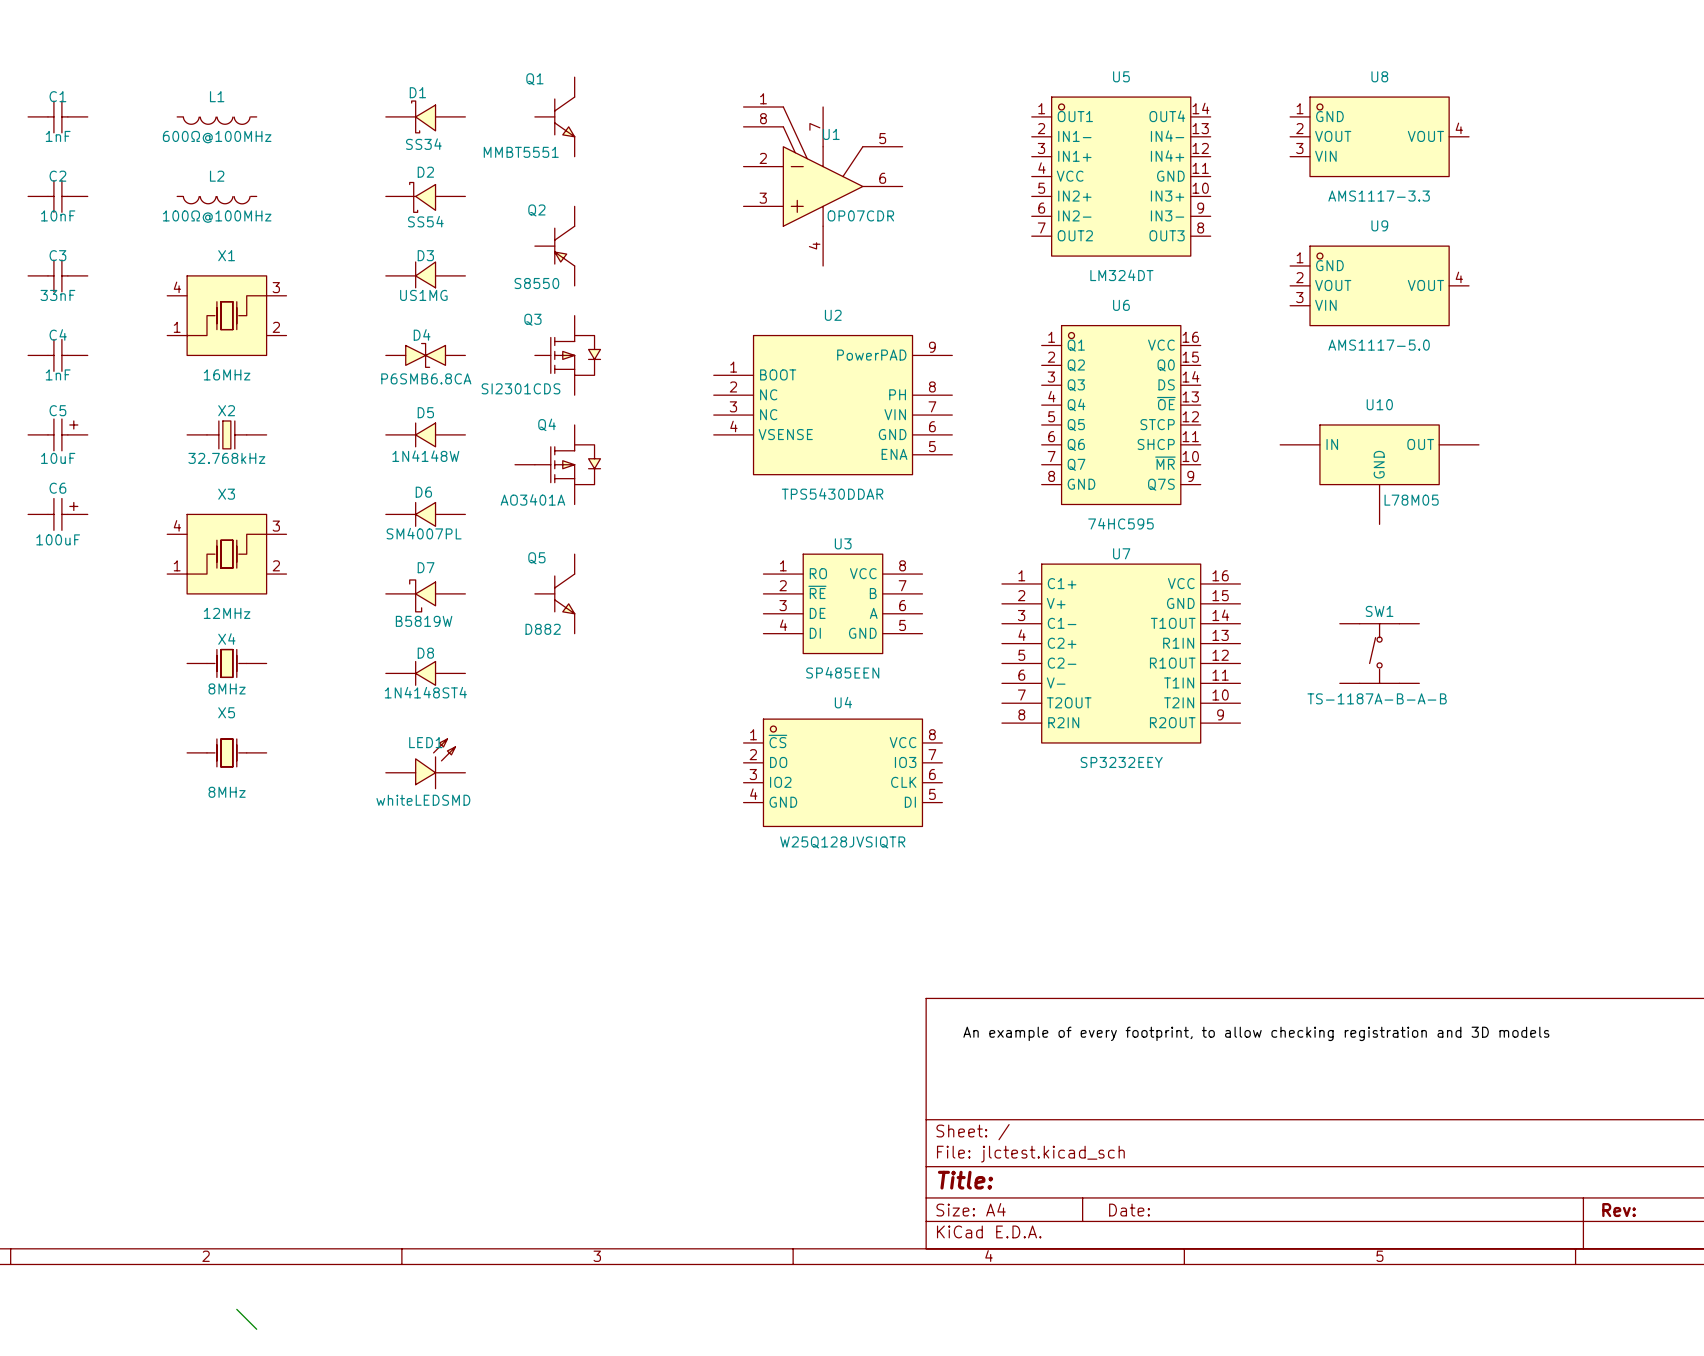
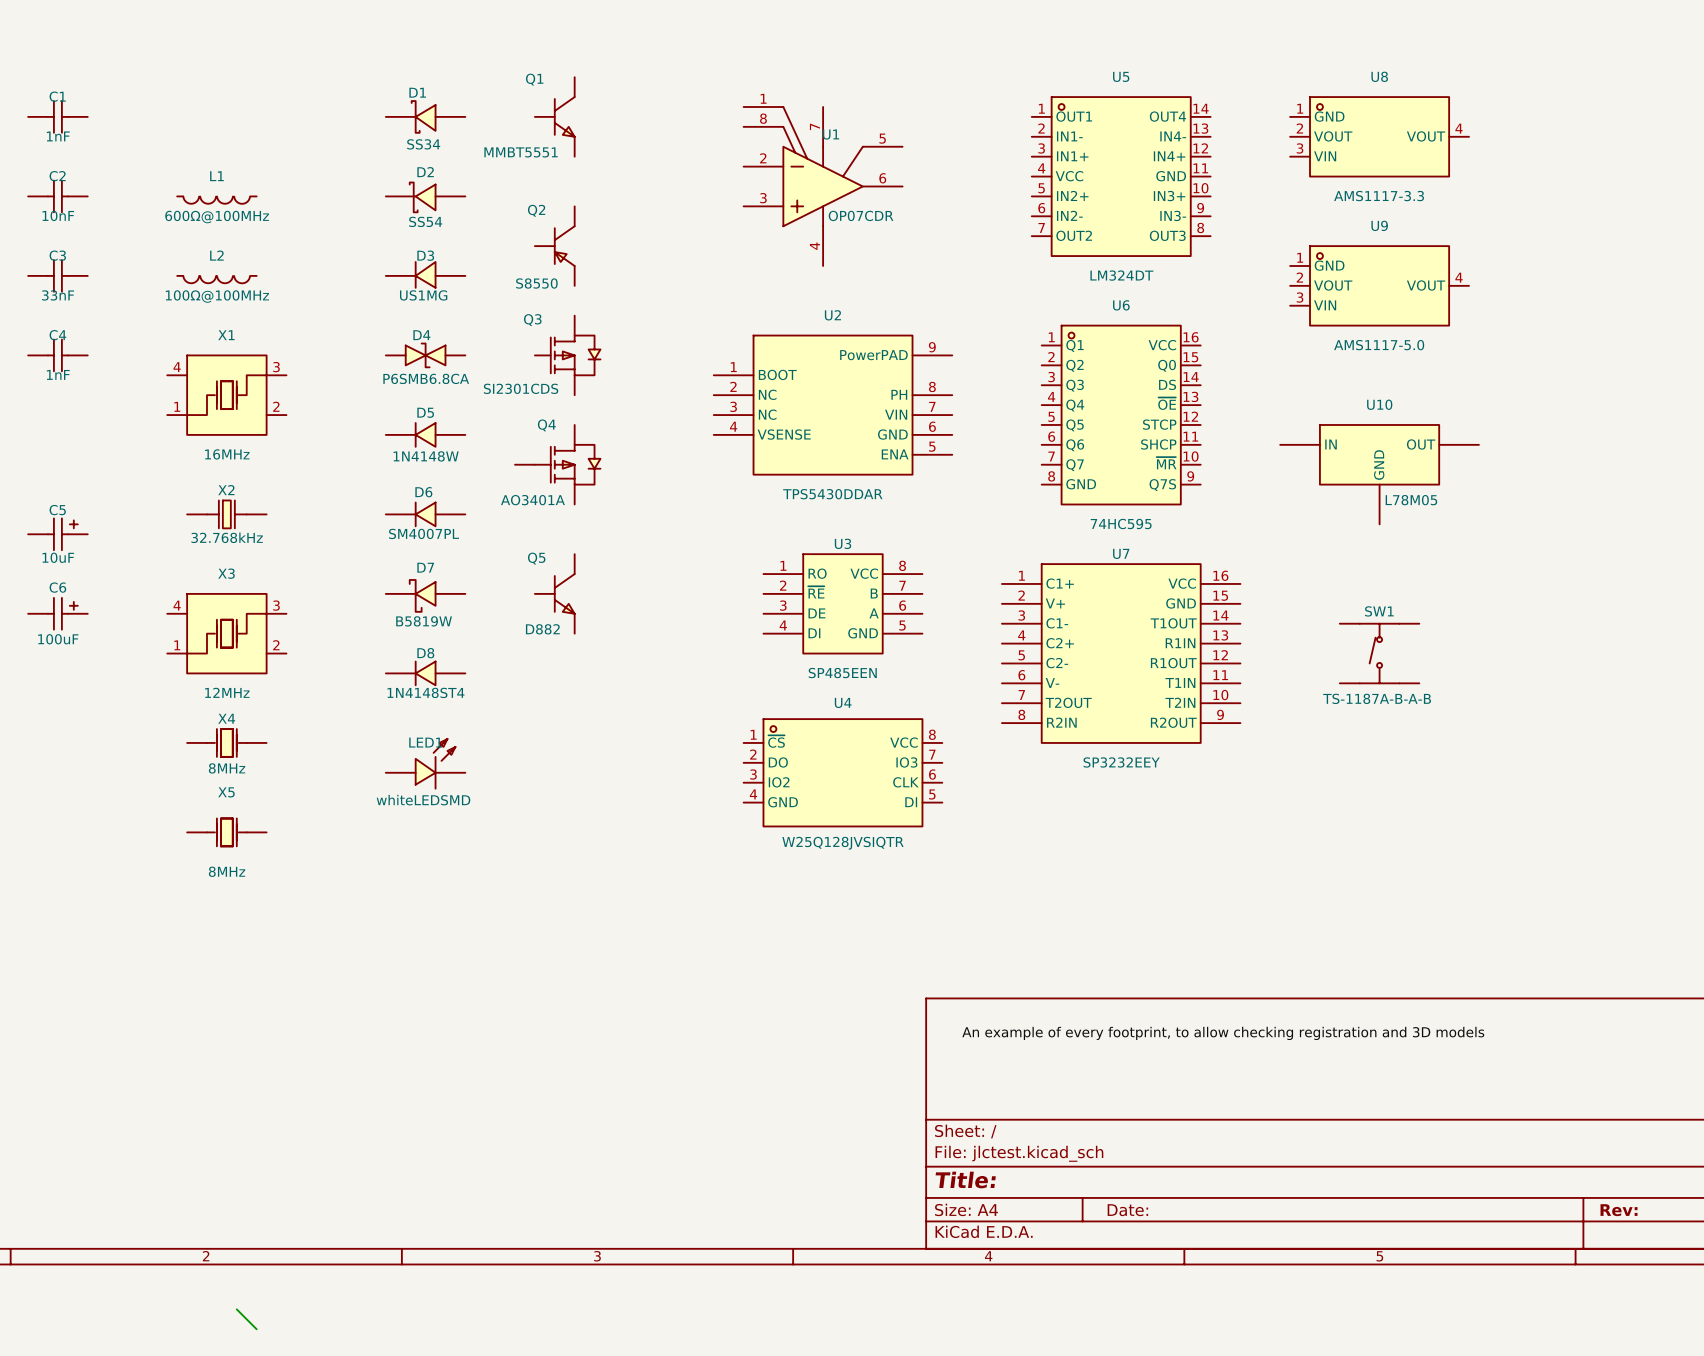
L1: 600Ω@100MHz (216, 120) -> none
L2 name: L2 (217, 176) -> L1 (216, 176)
L2 value: 100Ω@100MHz (217, 216) -> 600Ω@100MHz (217, 217)
L2: none -> 100Ω@100MHz (216, 279)
X1 position: (226, 315) -> (226, 395)
C5 position: (57, 434) -> (57, 534)
X2 position: (226, 434) -> (226, 514)
C6 position: (57, 514) -> (57, 613)
X3 position: (226, 554) -> (226, 633)
X4 position: (226, 663) -> (226, 742)
X5 position: (226, 752) -> (226, 832)

